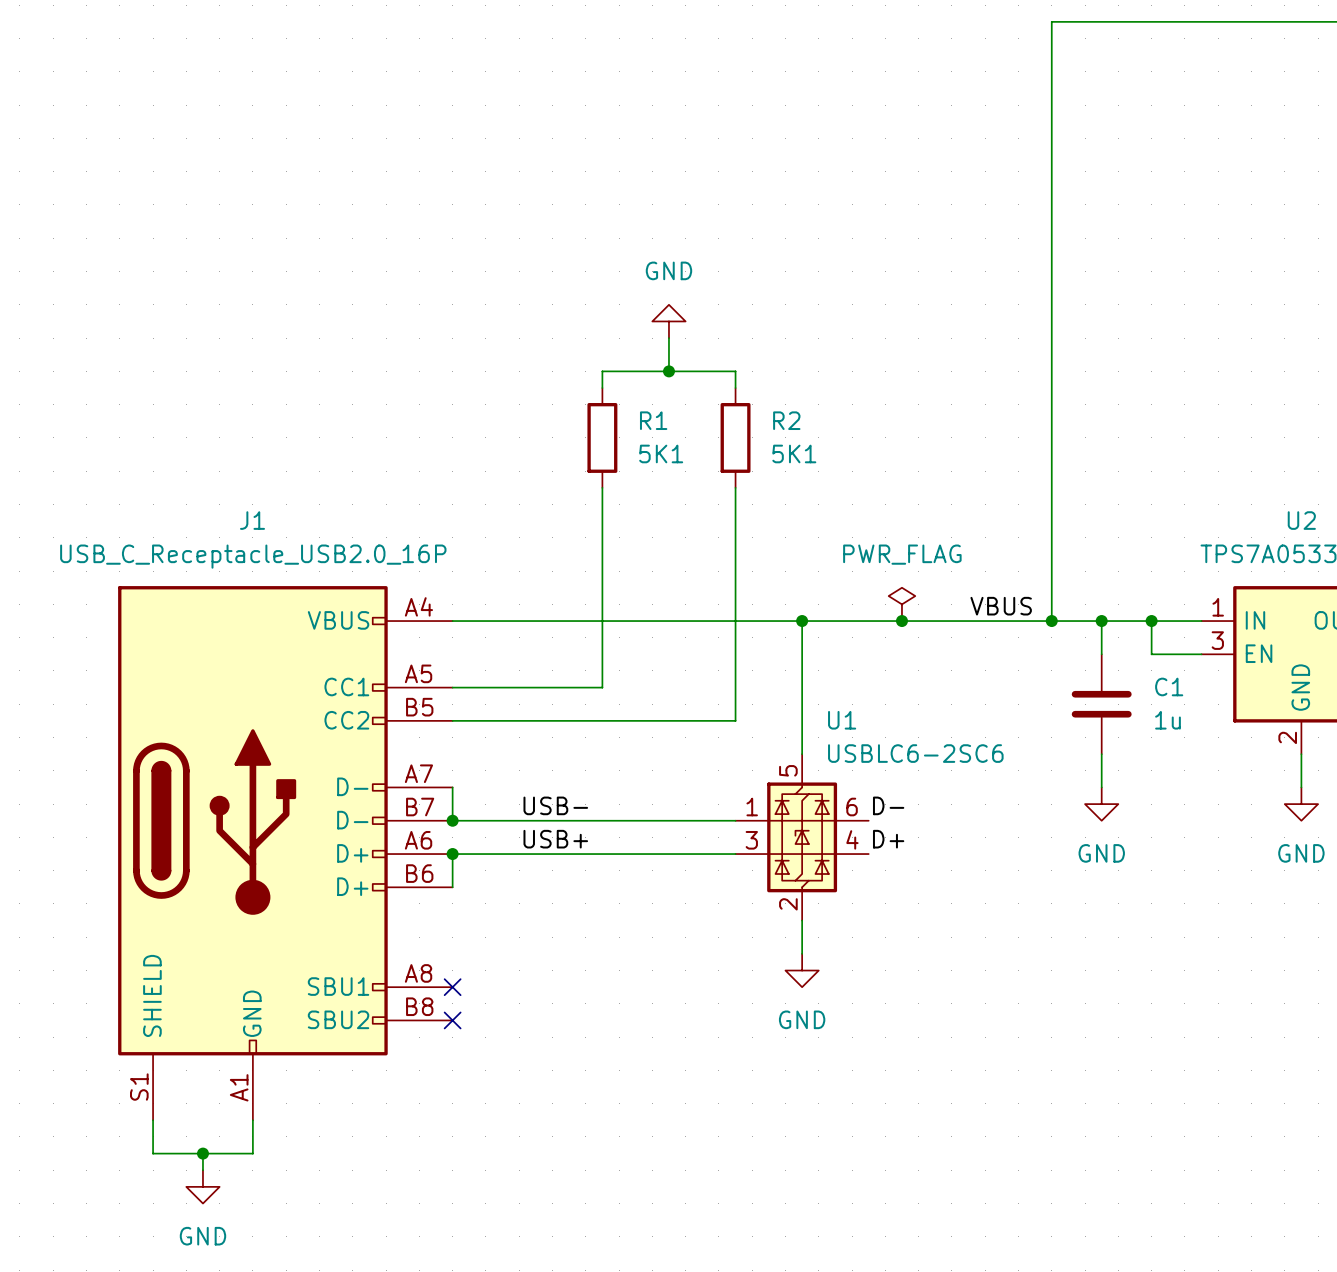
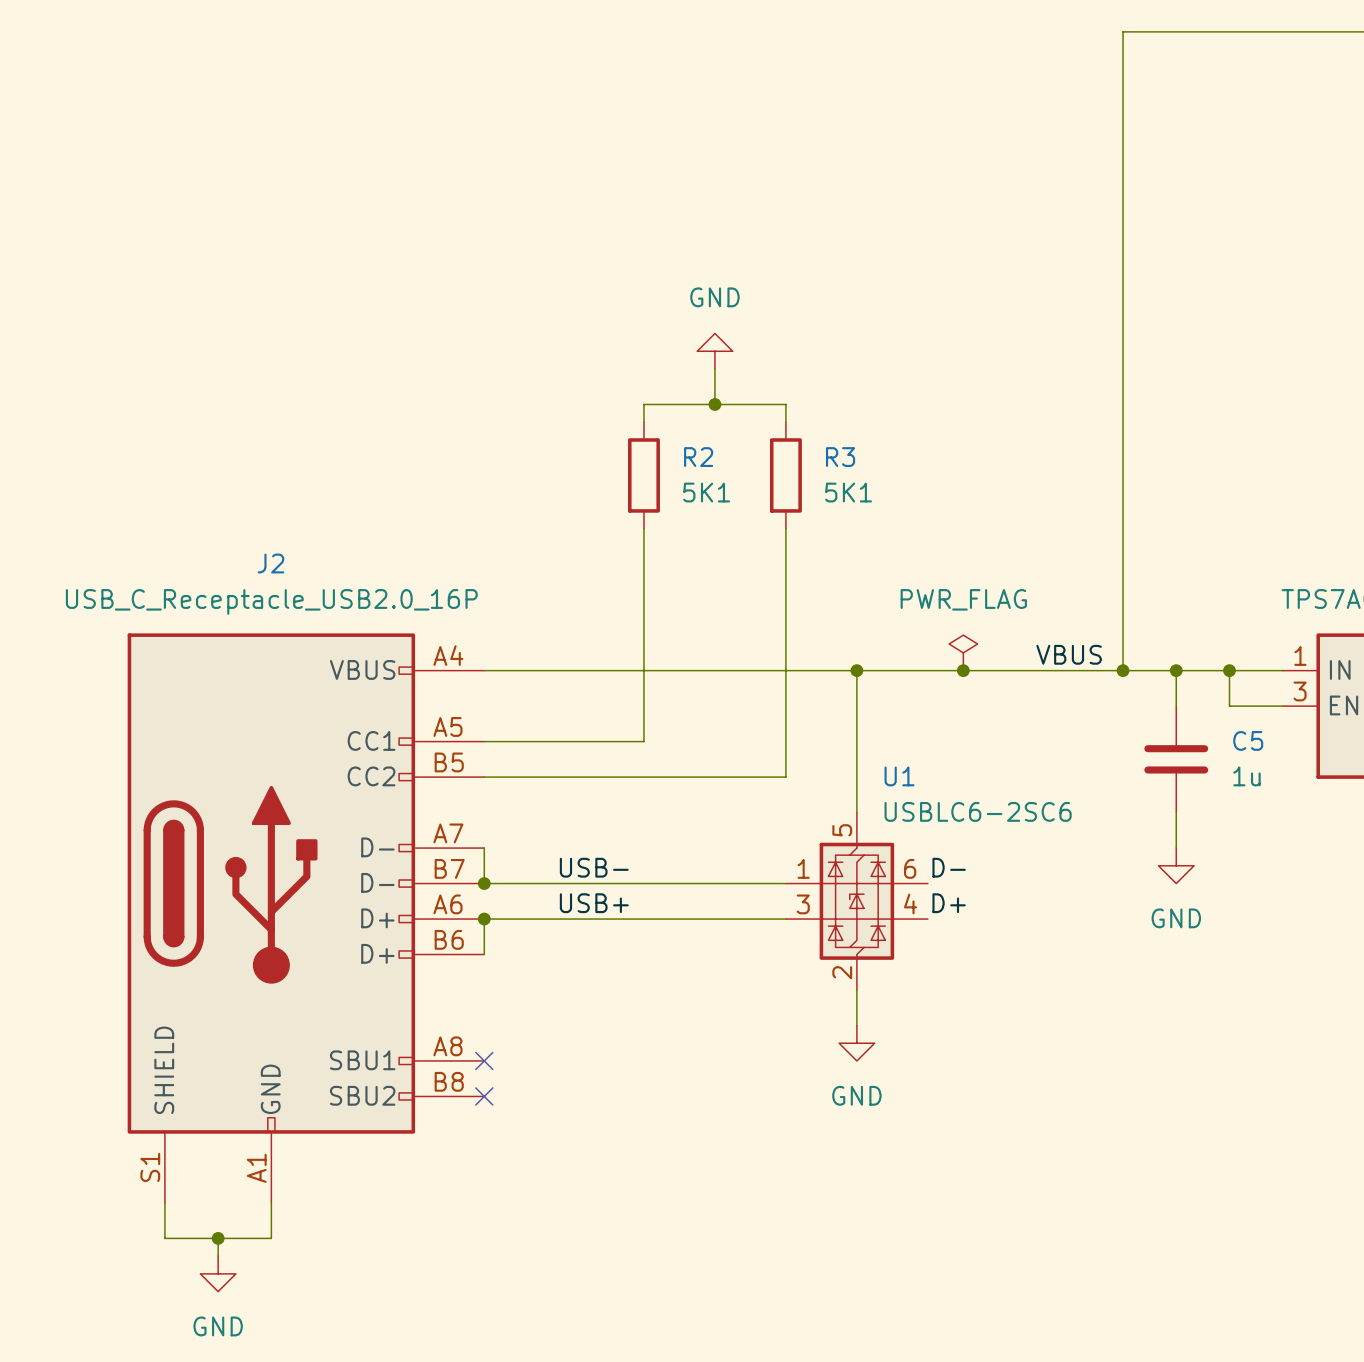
R1 name: R1 (653, 420) -> R2 (698, 457)
R2 name: R2 (786, 420) -> R3 (840, 457)
J1 name: J1 (252, 520) -> J2 (270, 563)
C1 name: C1 (1169, 686) -> C5 (1248, 740)

